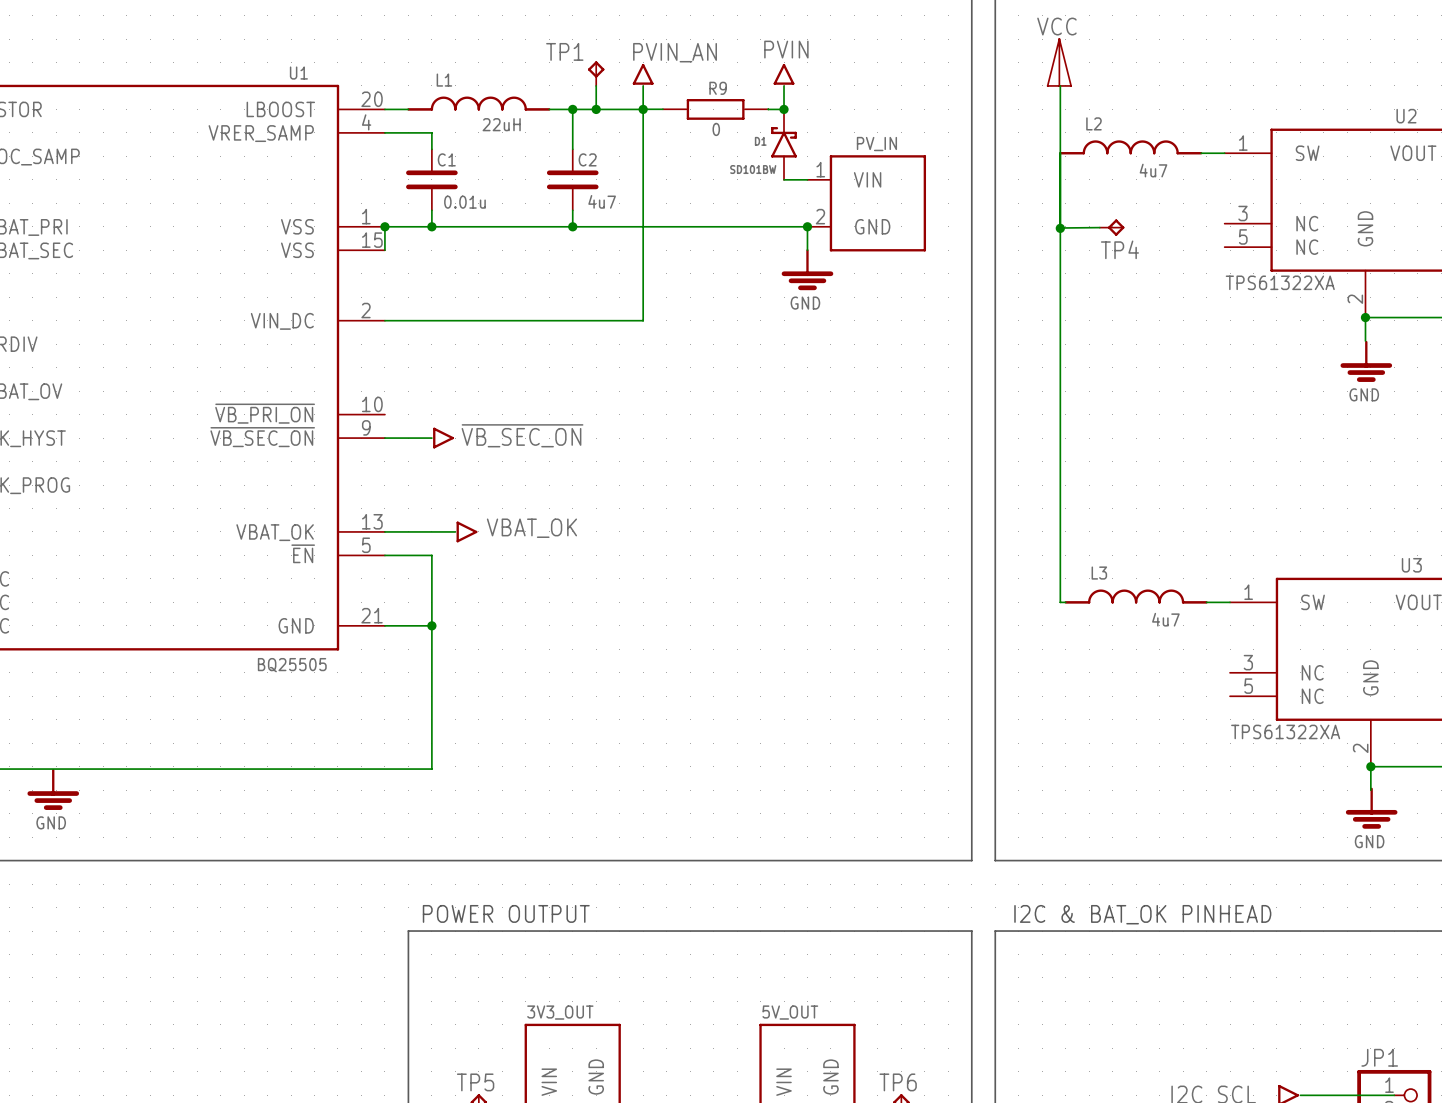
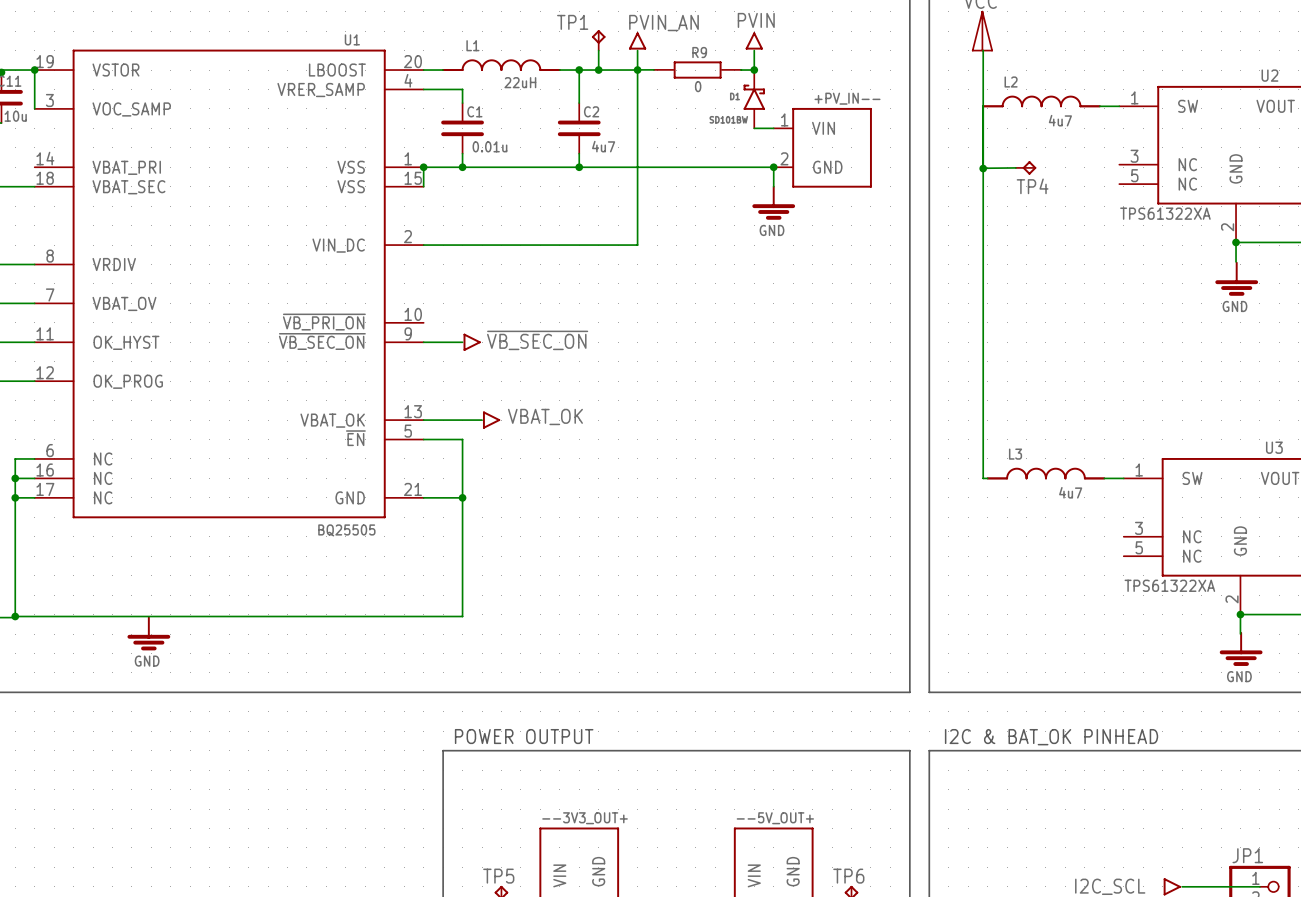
PV_IN name: PV_IN (876, 144) -> +PV_IN-- (847, 98)
3V3_OUT name: 3V3_OUT (560, 1012) -> --3V3_OUT+ (585, 818)
5V_OUT name: 5V_OUT (790, 1012) -> --5V_OUT+ (775, 818)

